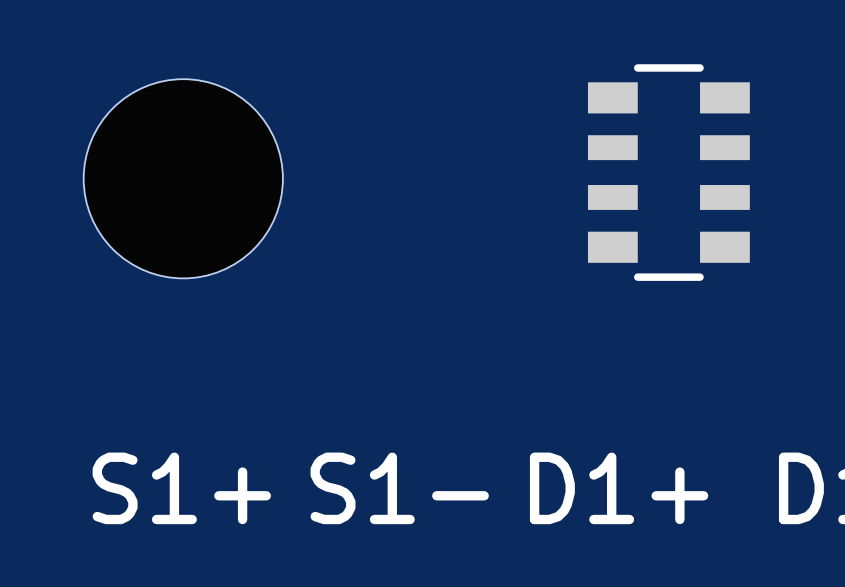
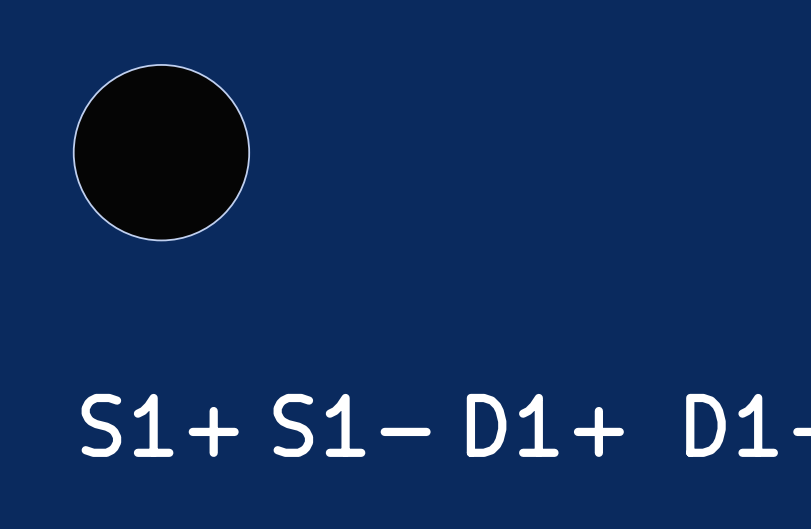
part: (668, 172) -> none

